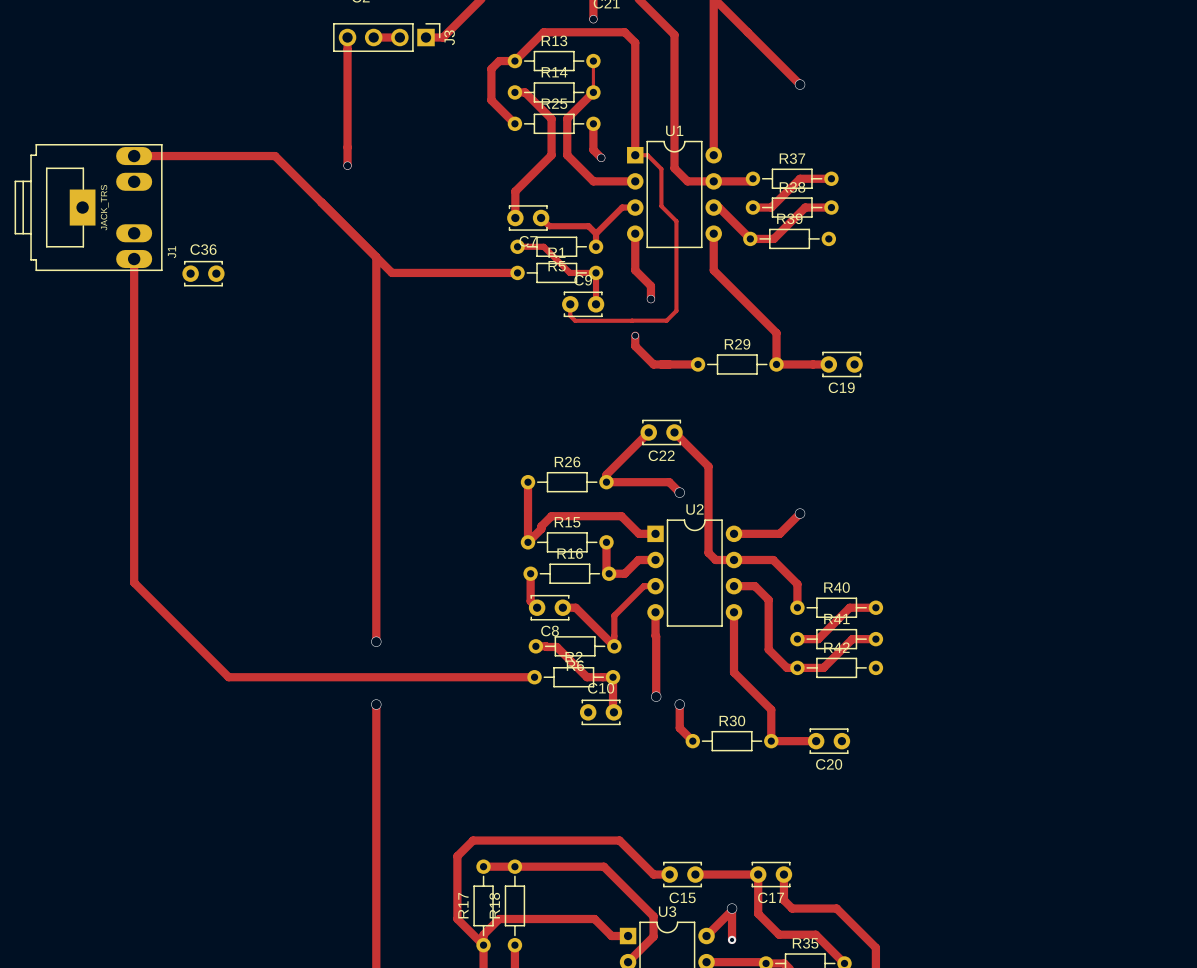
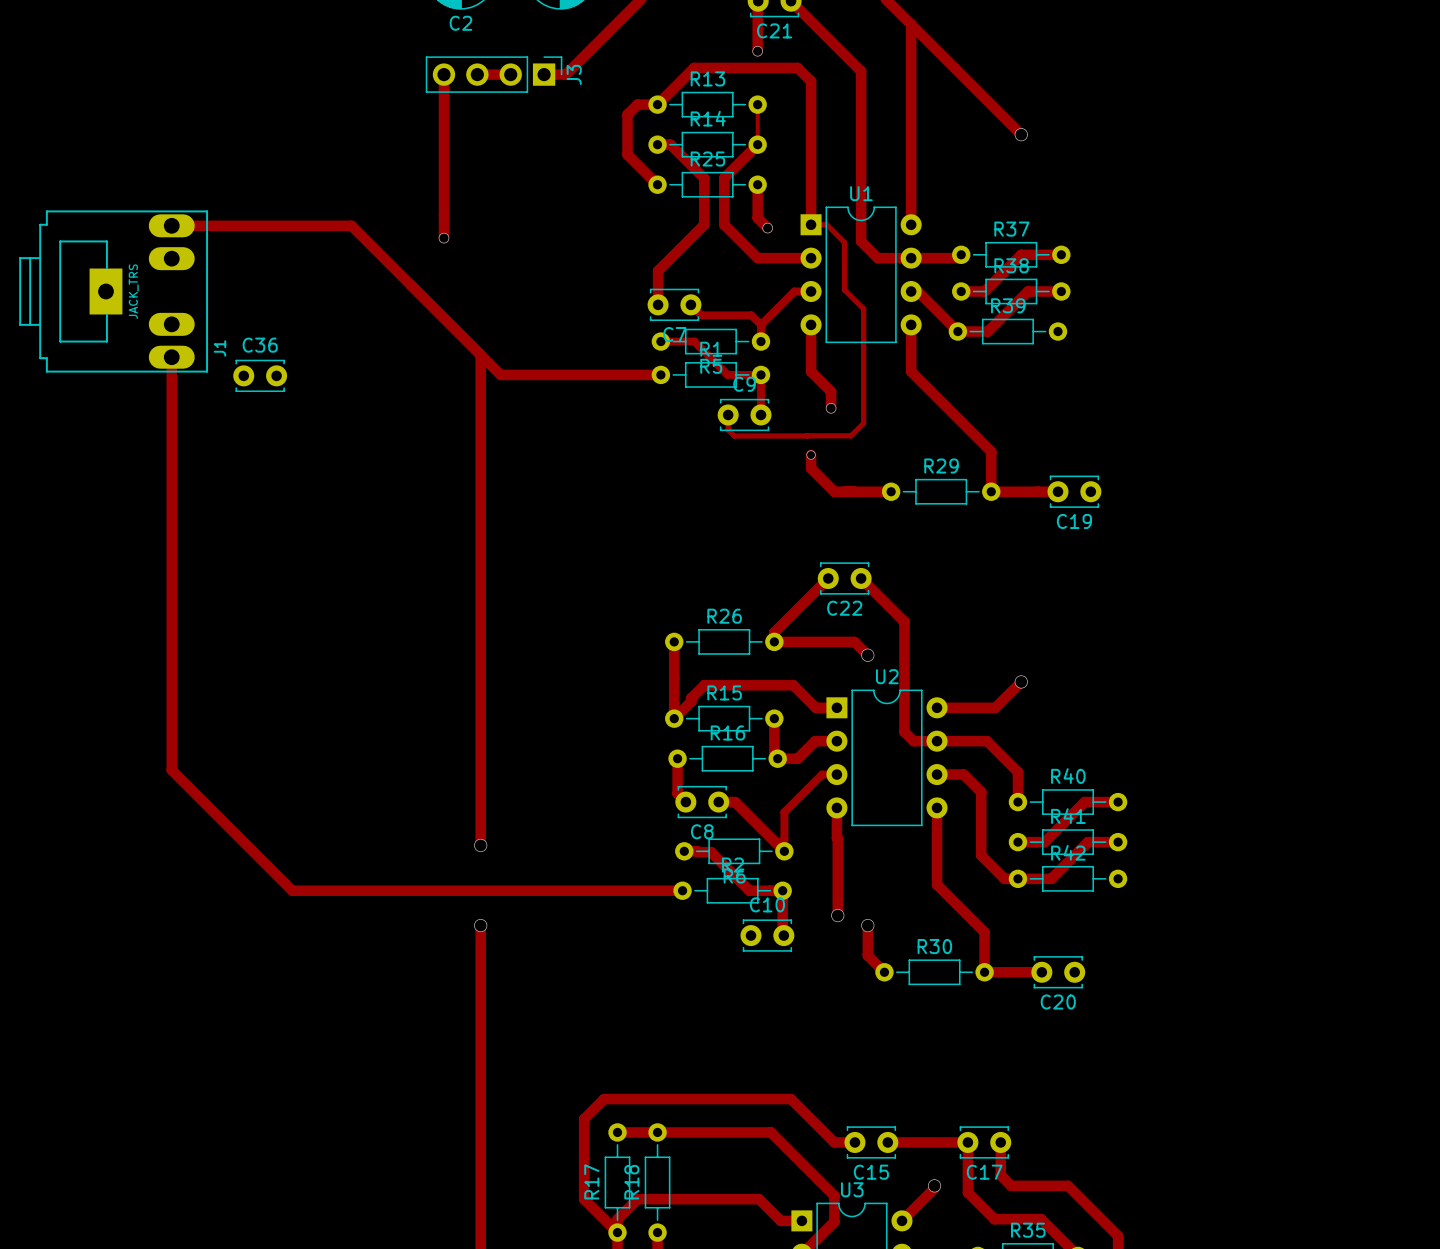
track: (732, 910) (732, 939) -> none
via: (732, 939) -> none

